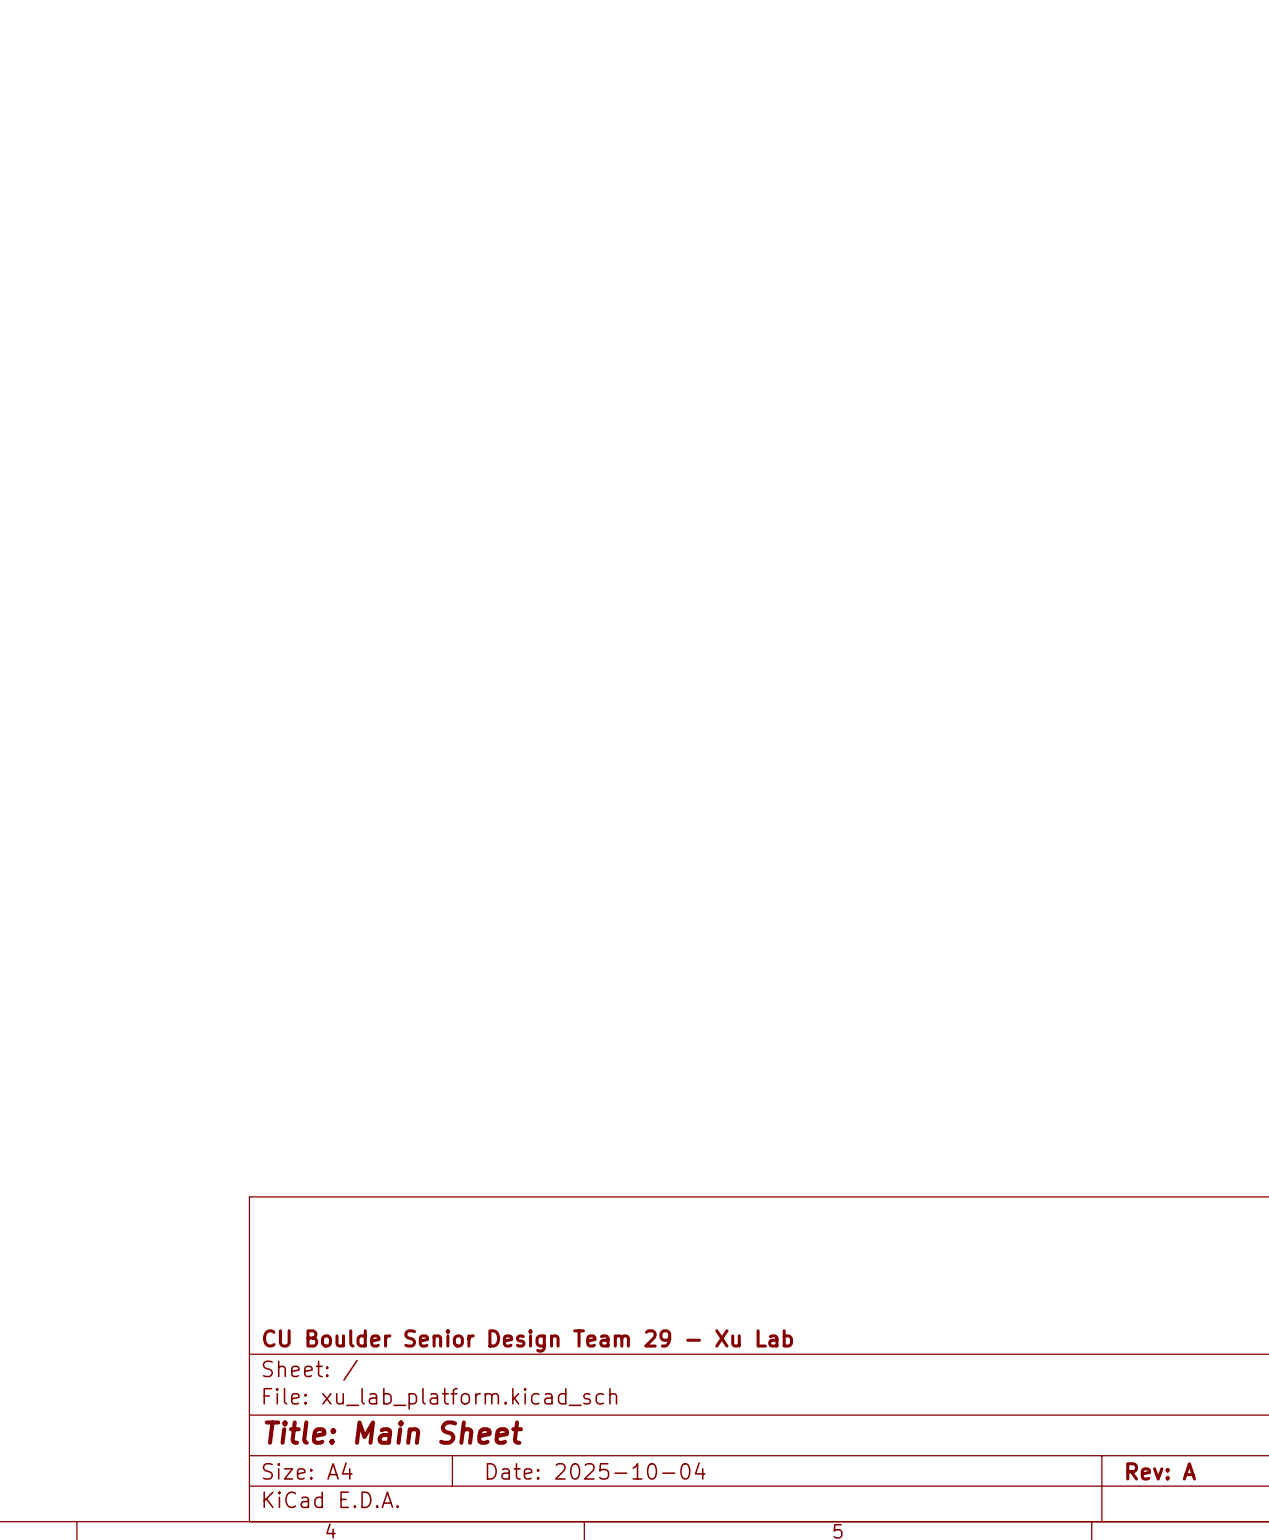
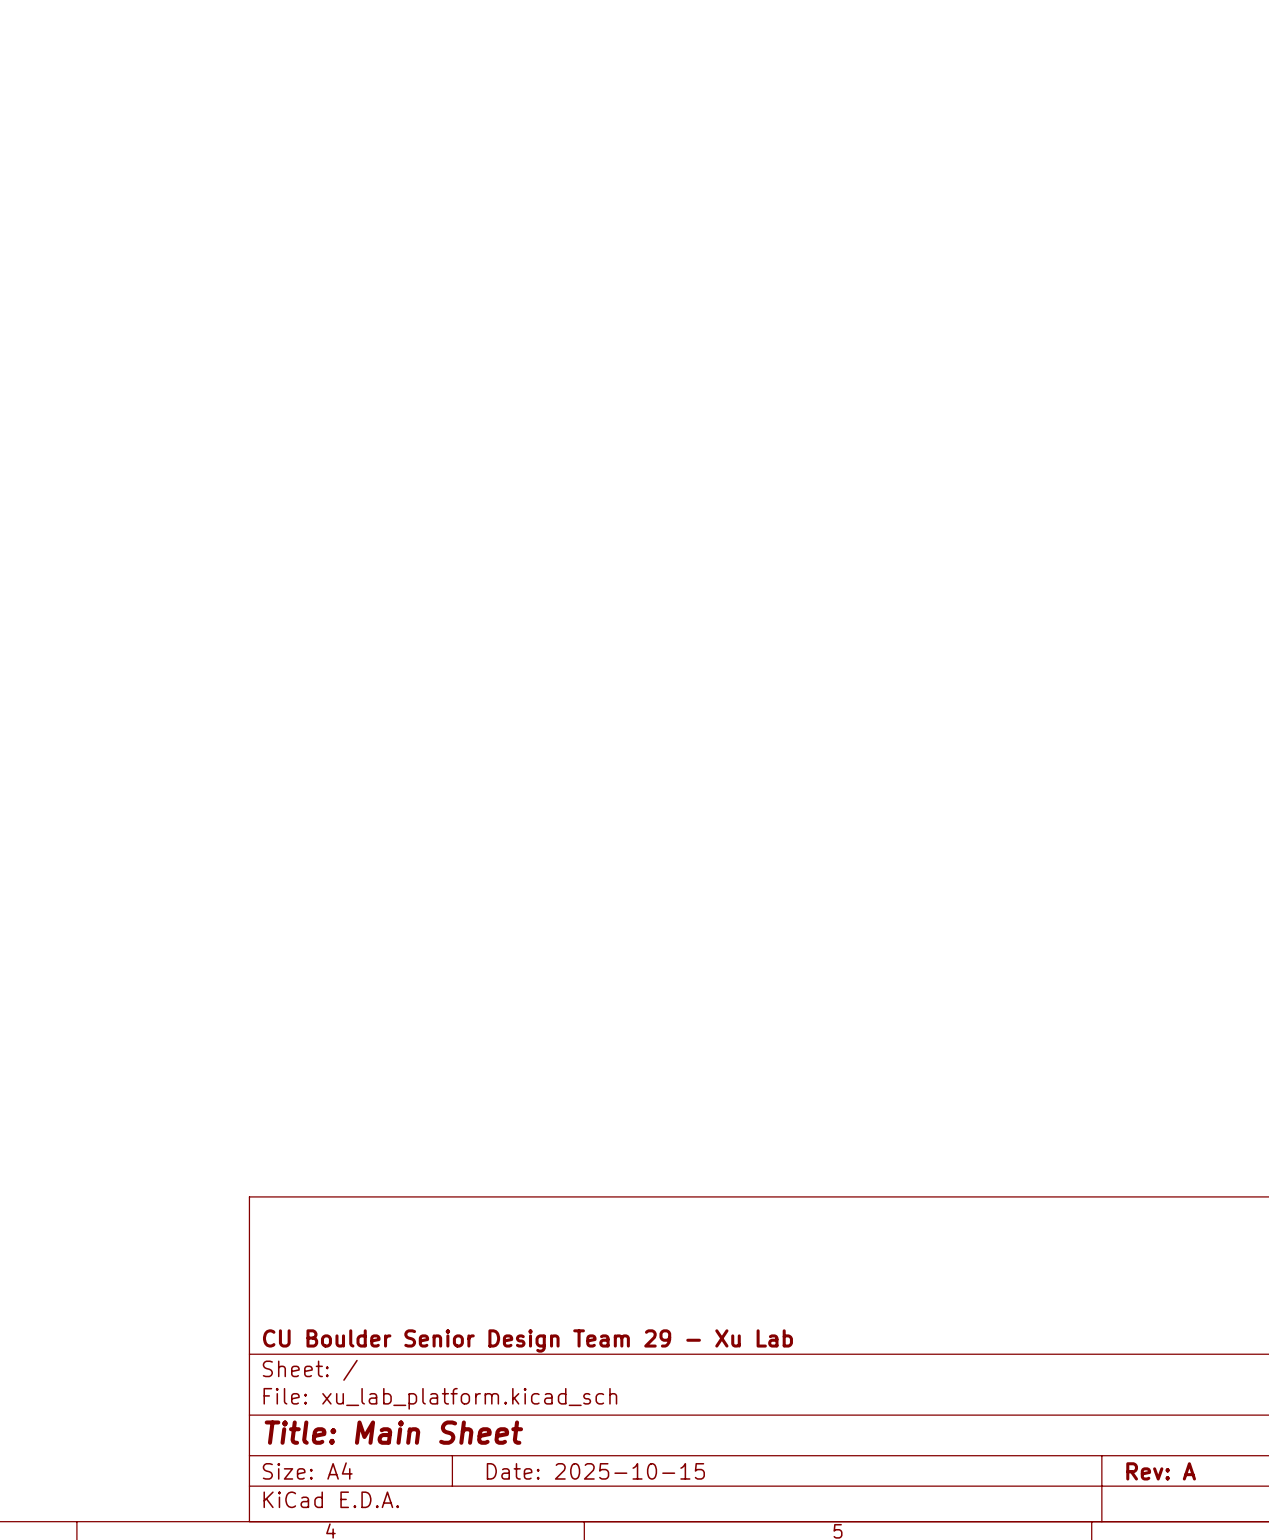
title block: Date: 2025-10-04 (596, 1471) -> Date: 2025-10-15 (595, 1471)

